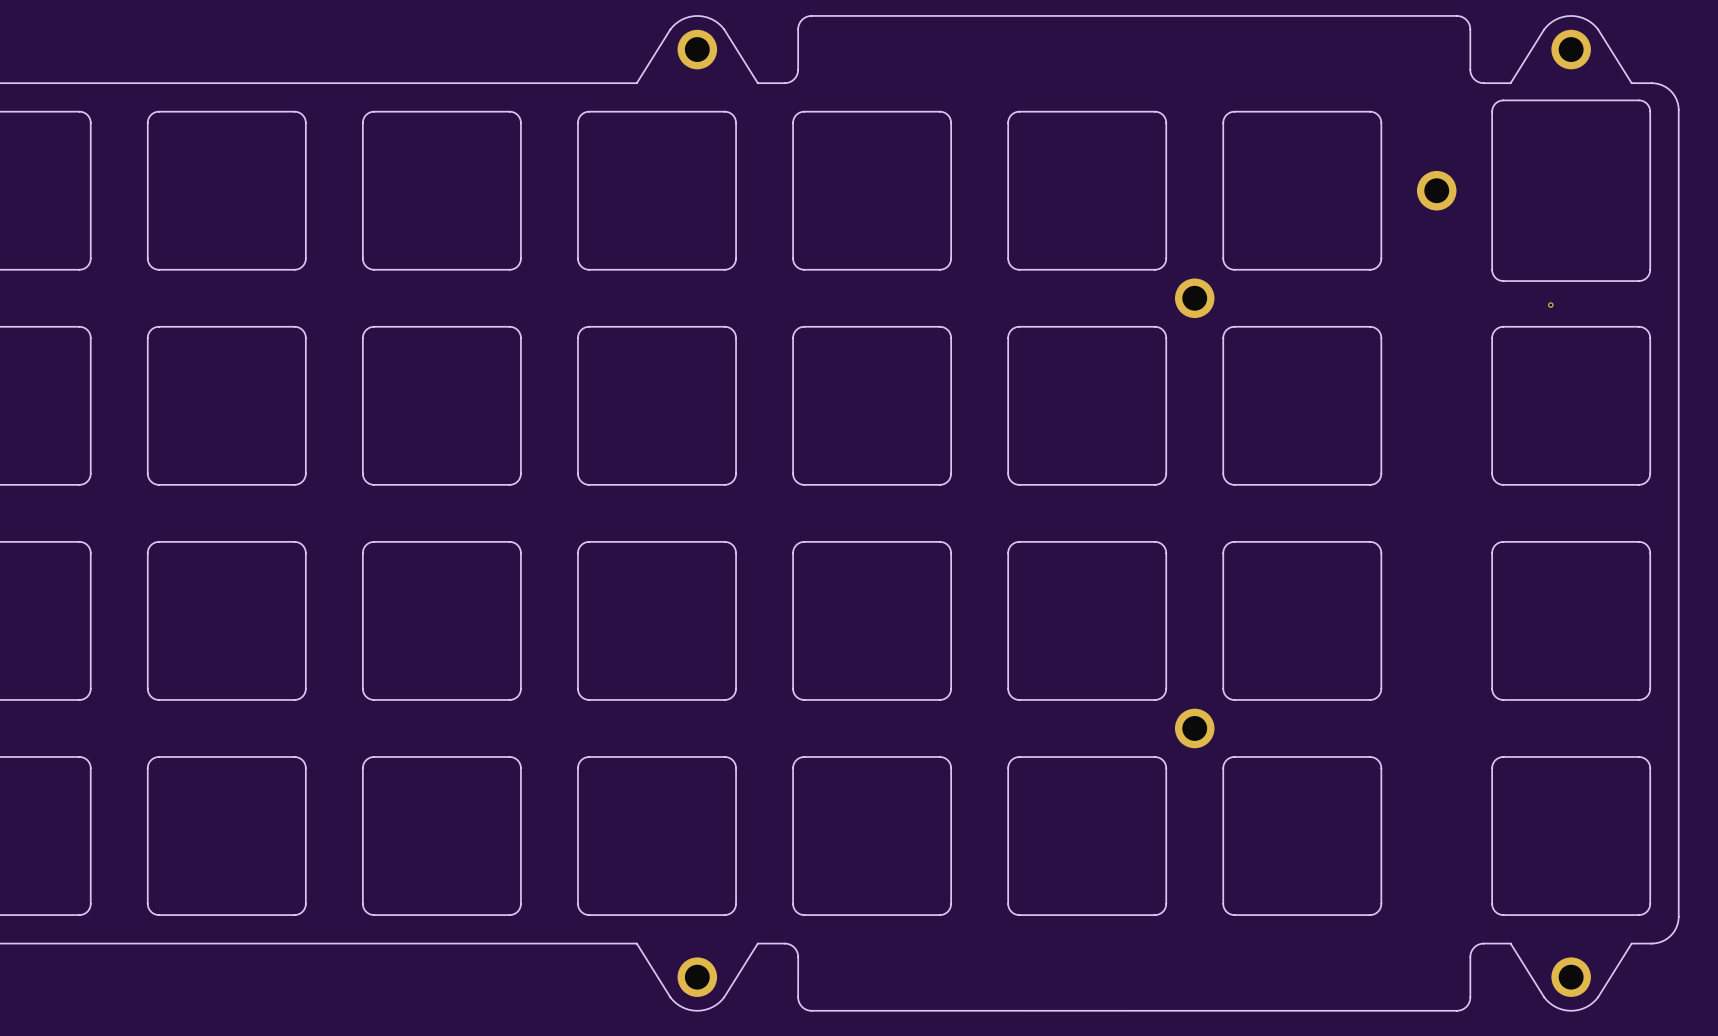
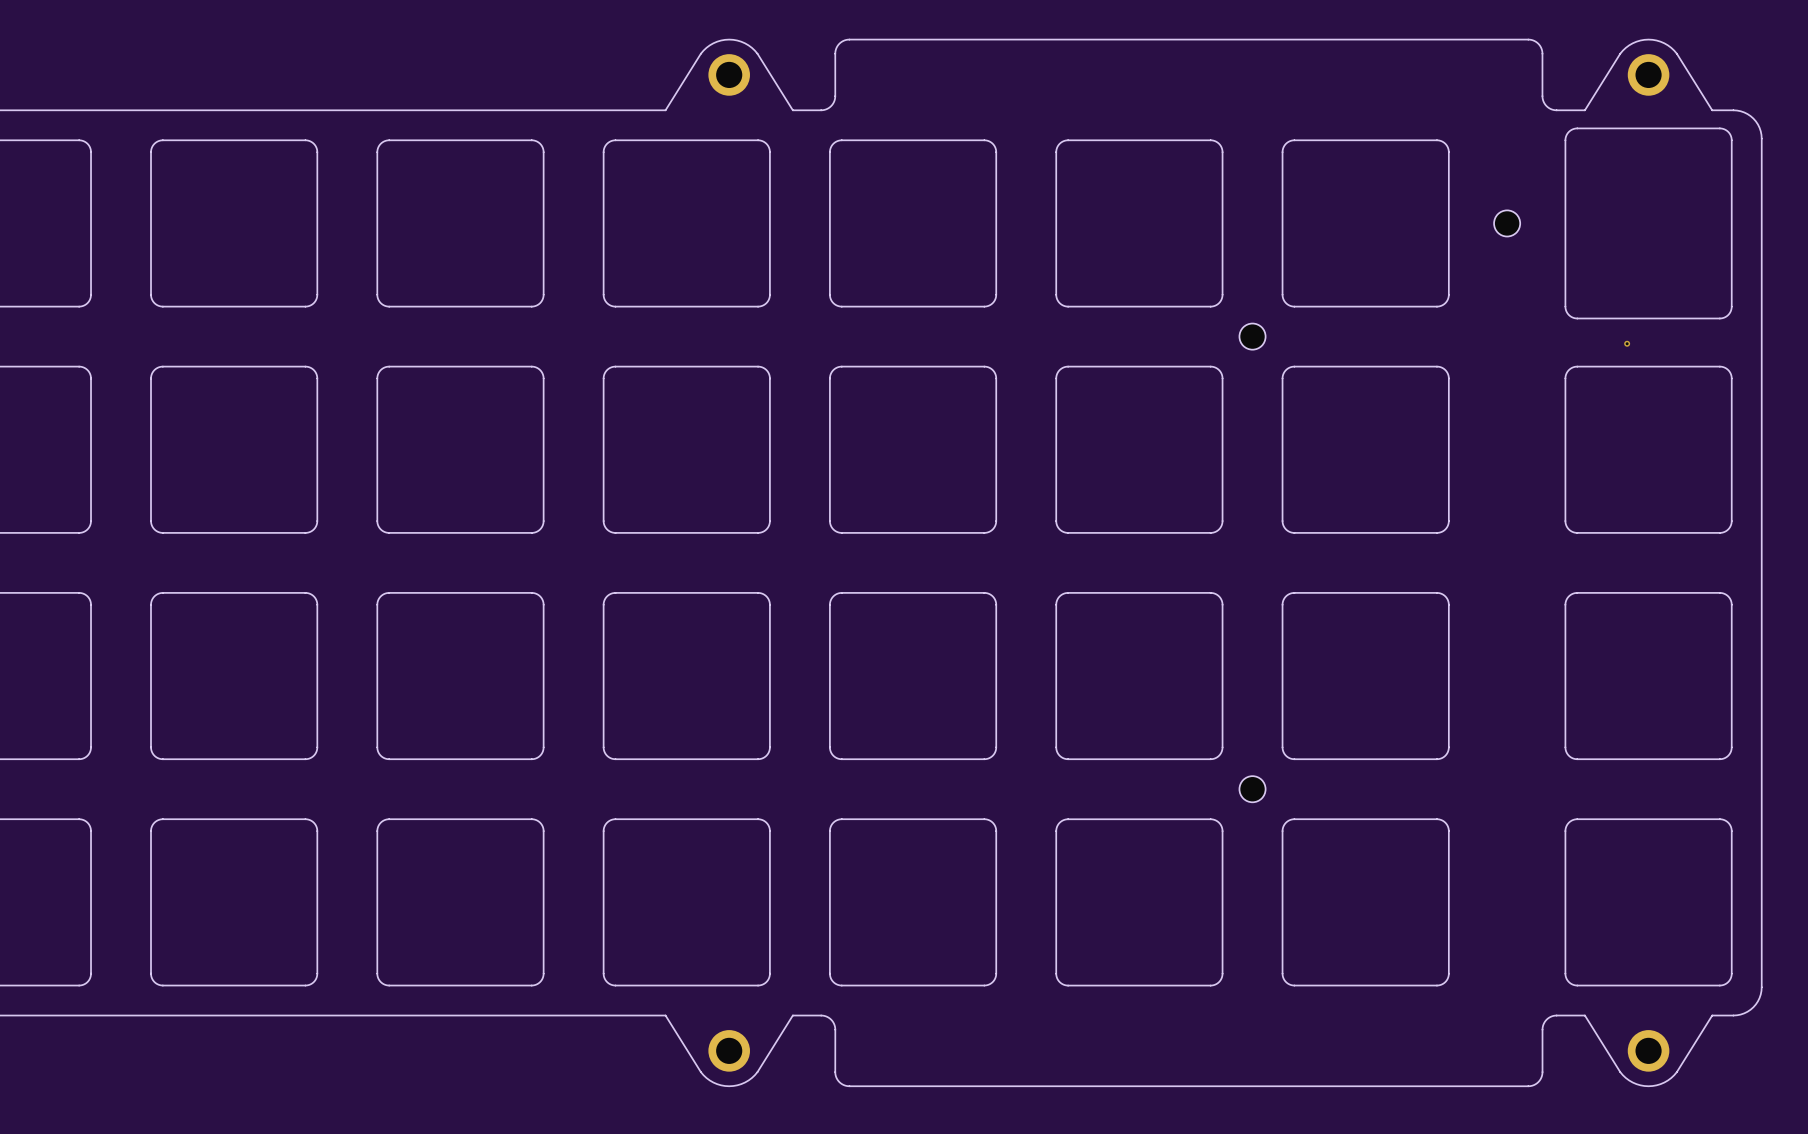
part footprint: [1416, 170, 1457, 211] -> [1494, 210, 1521, 237]
part footprint: [1174, 278, 1215, 319] -> [1239, 323, 1266, 350]
part footprint: [1174, 708, 1215, 749] -> [1239, 776, 1266, 803]

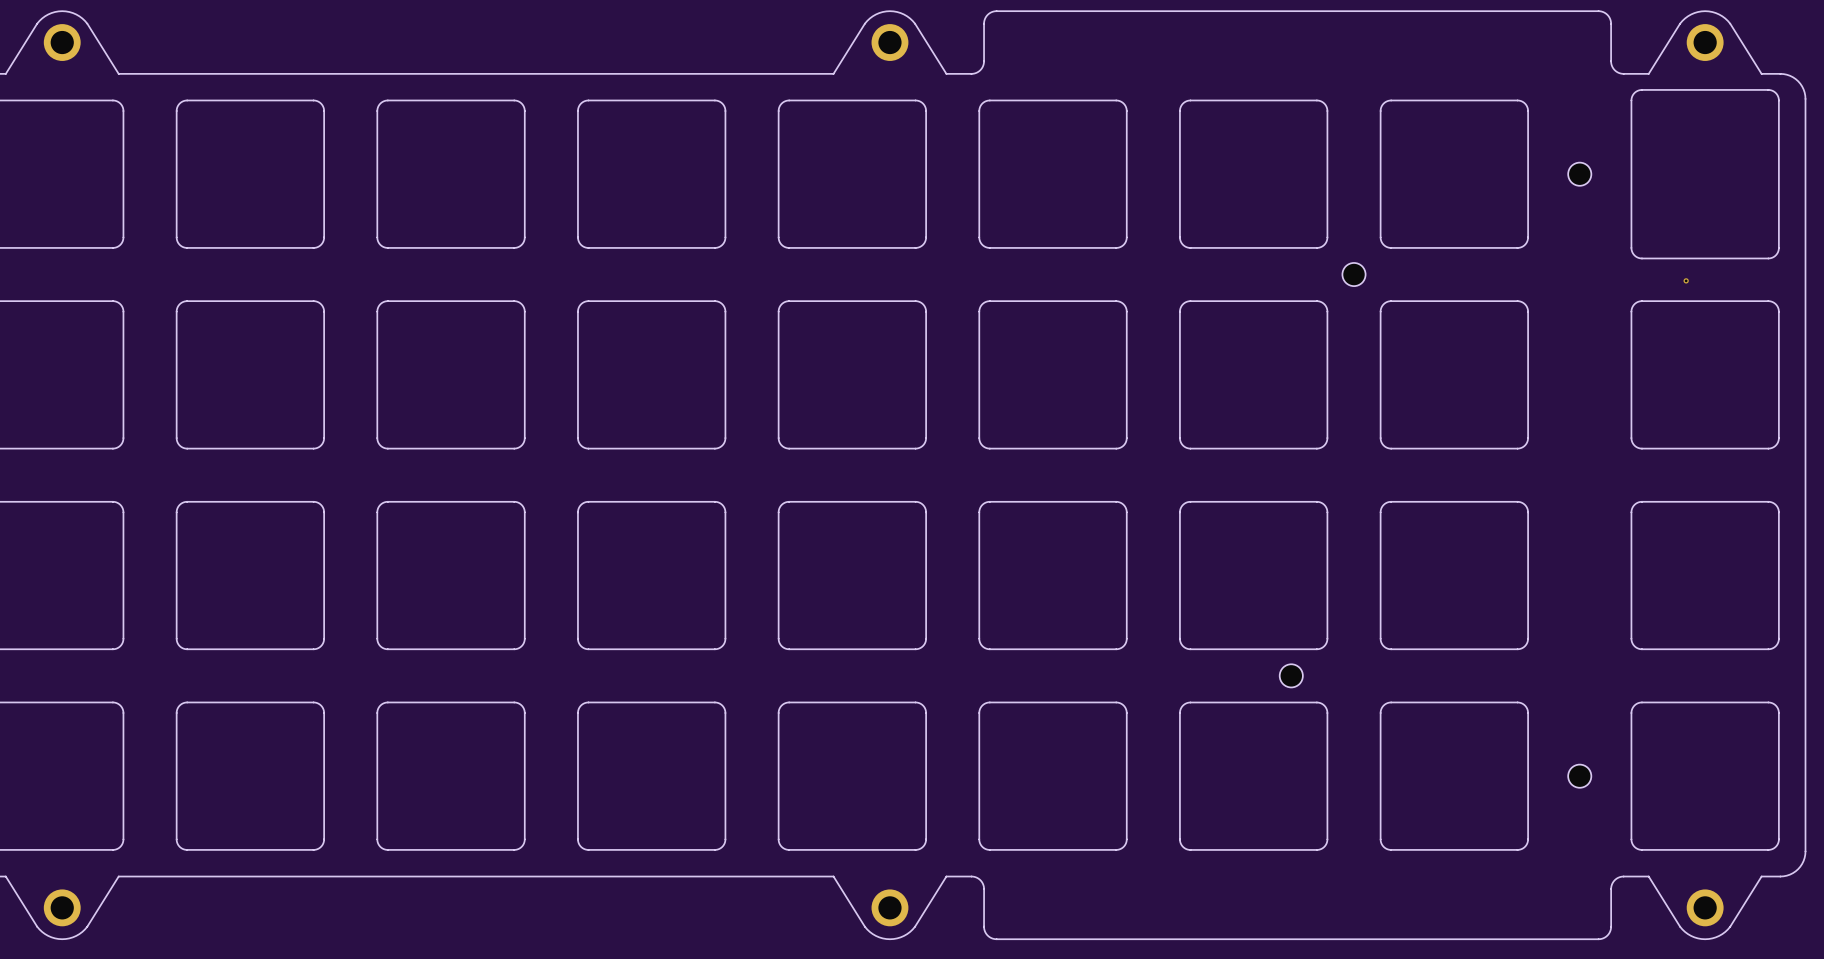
part position: (1252, 789) -> (1291, 675)
part: none -> (1579, 776)

